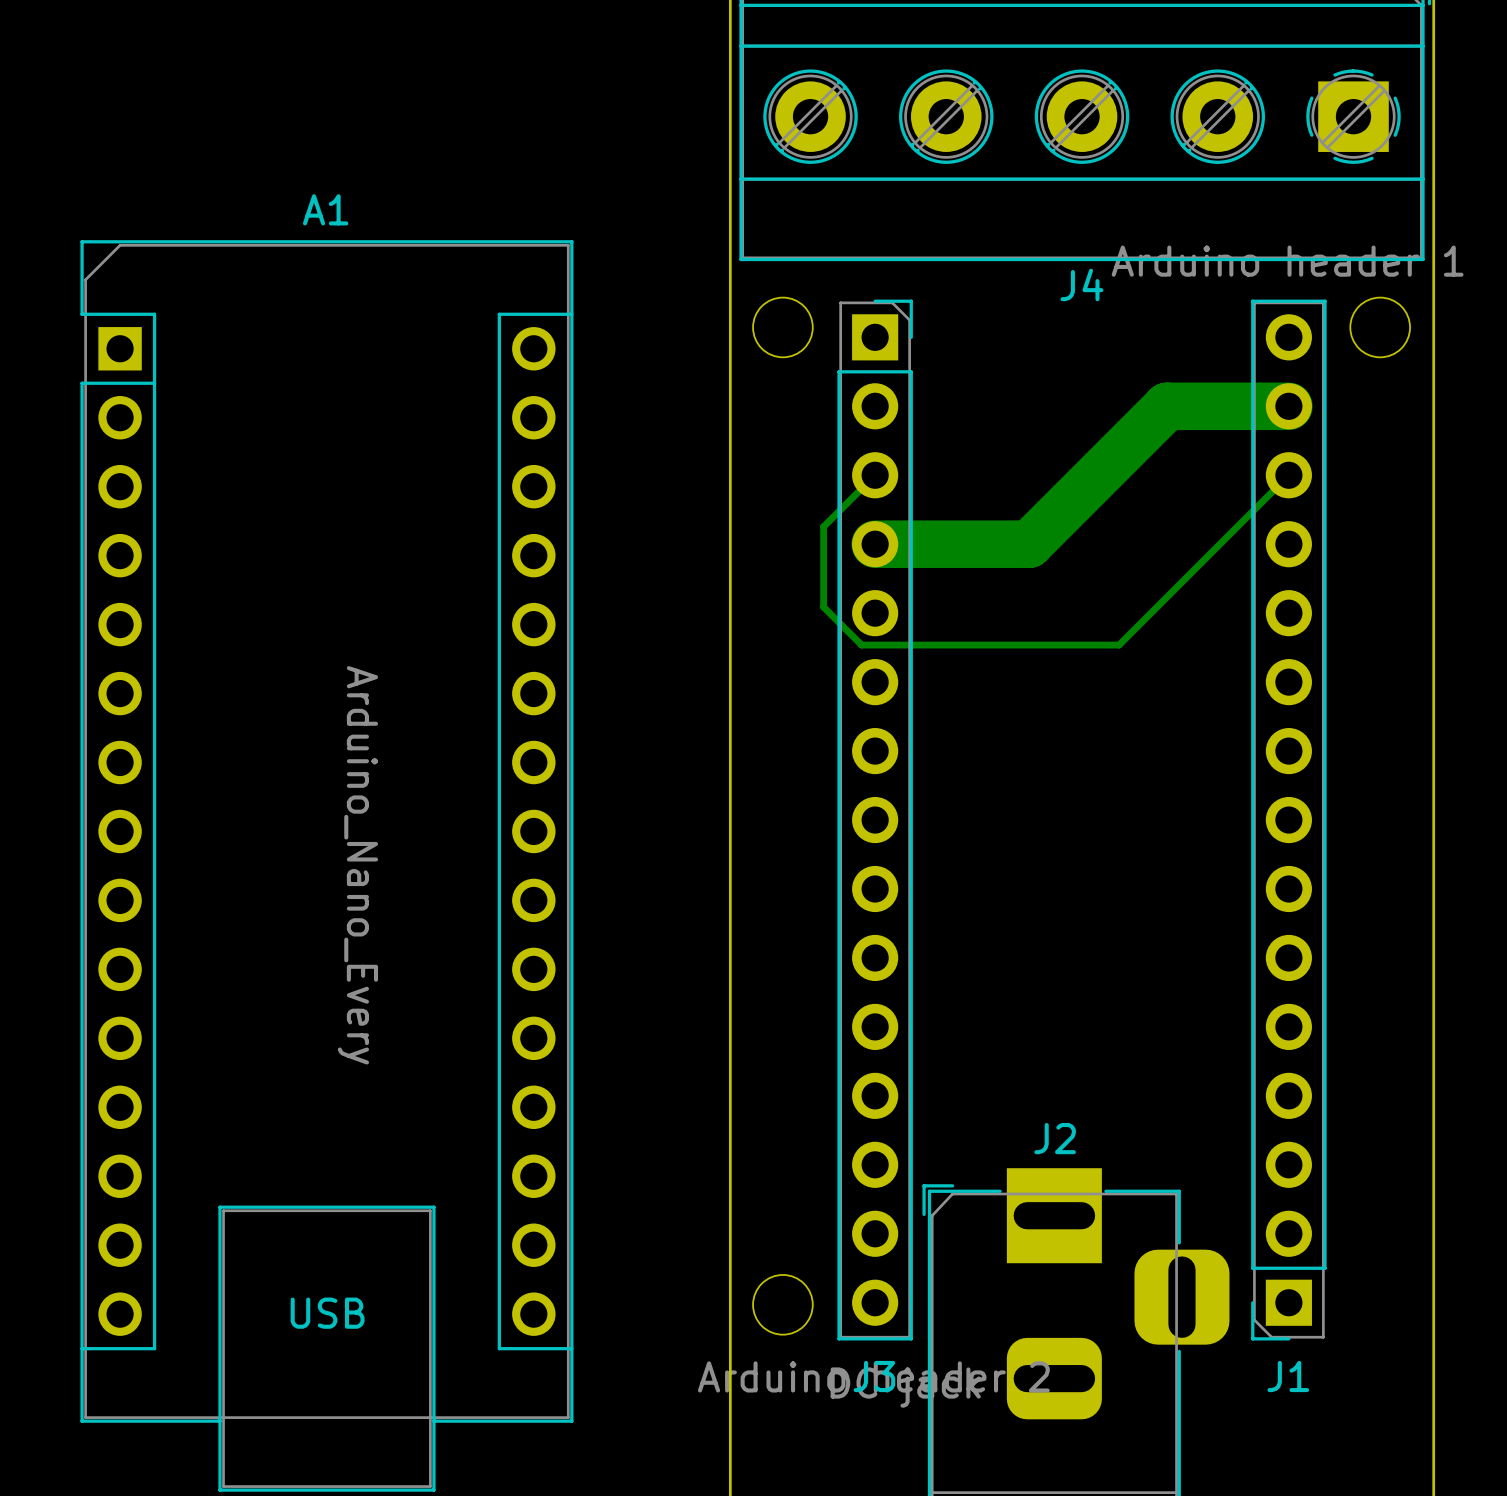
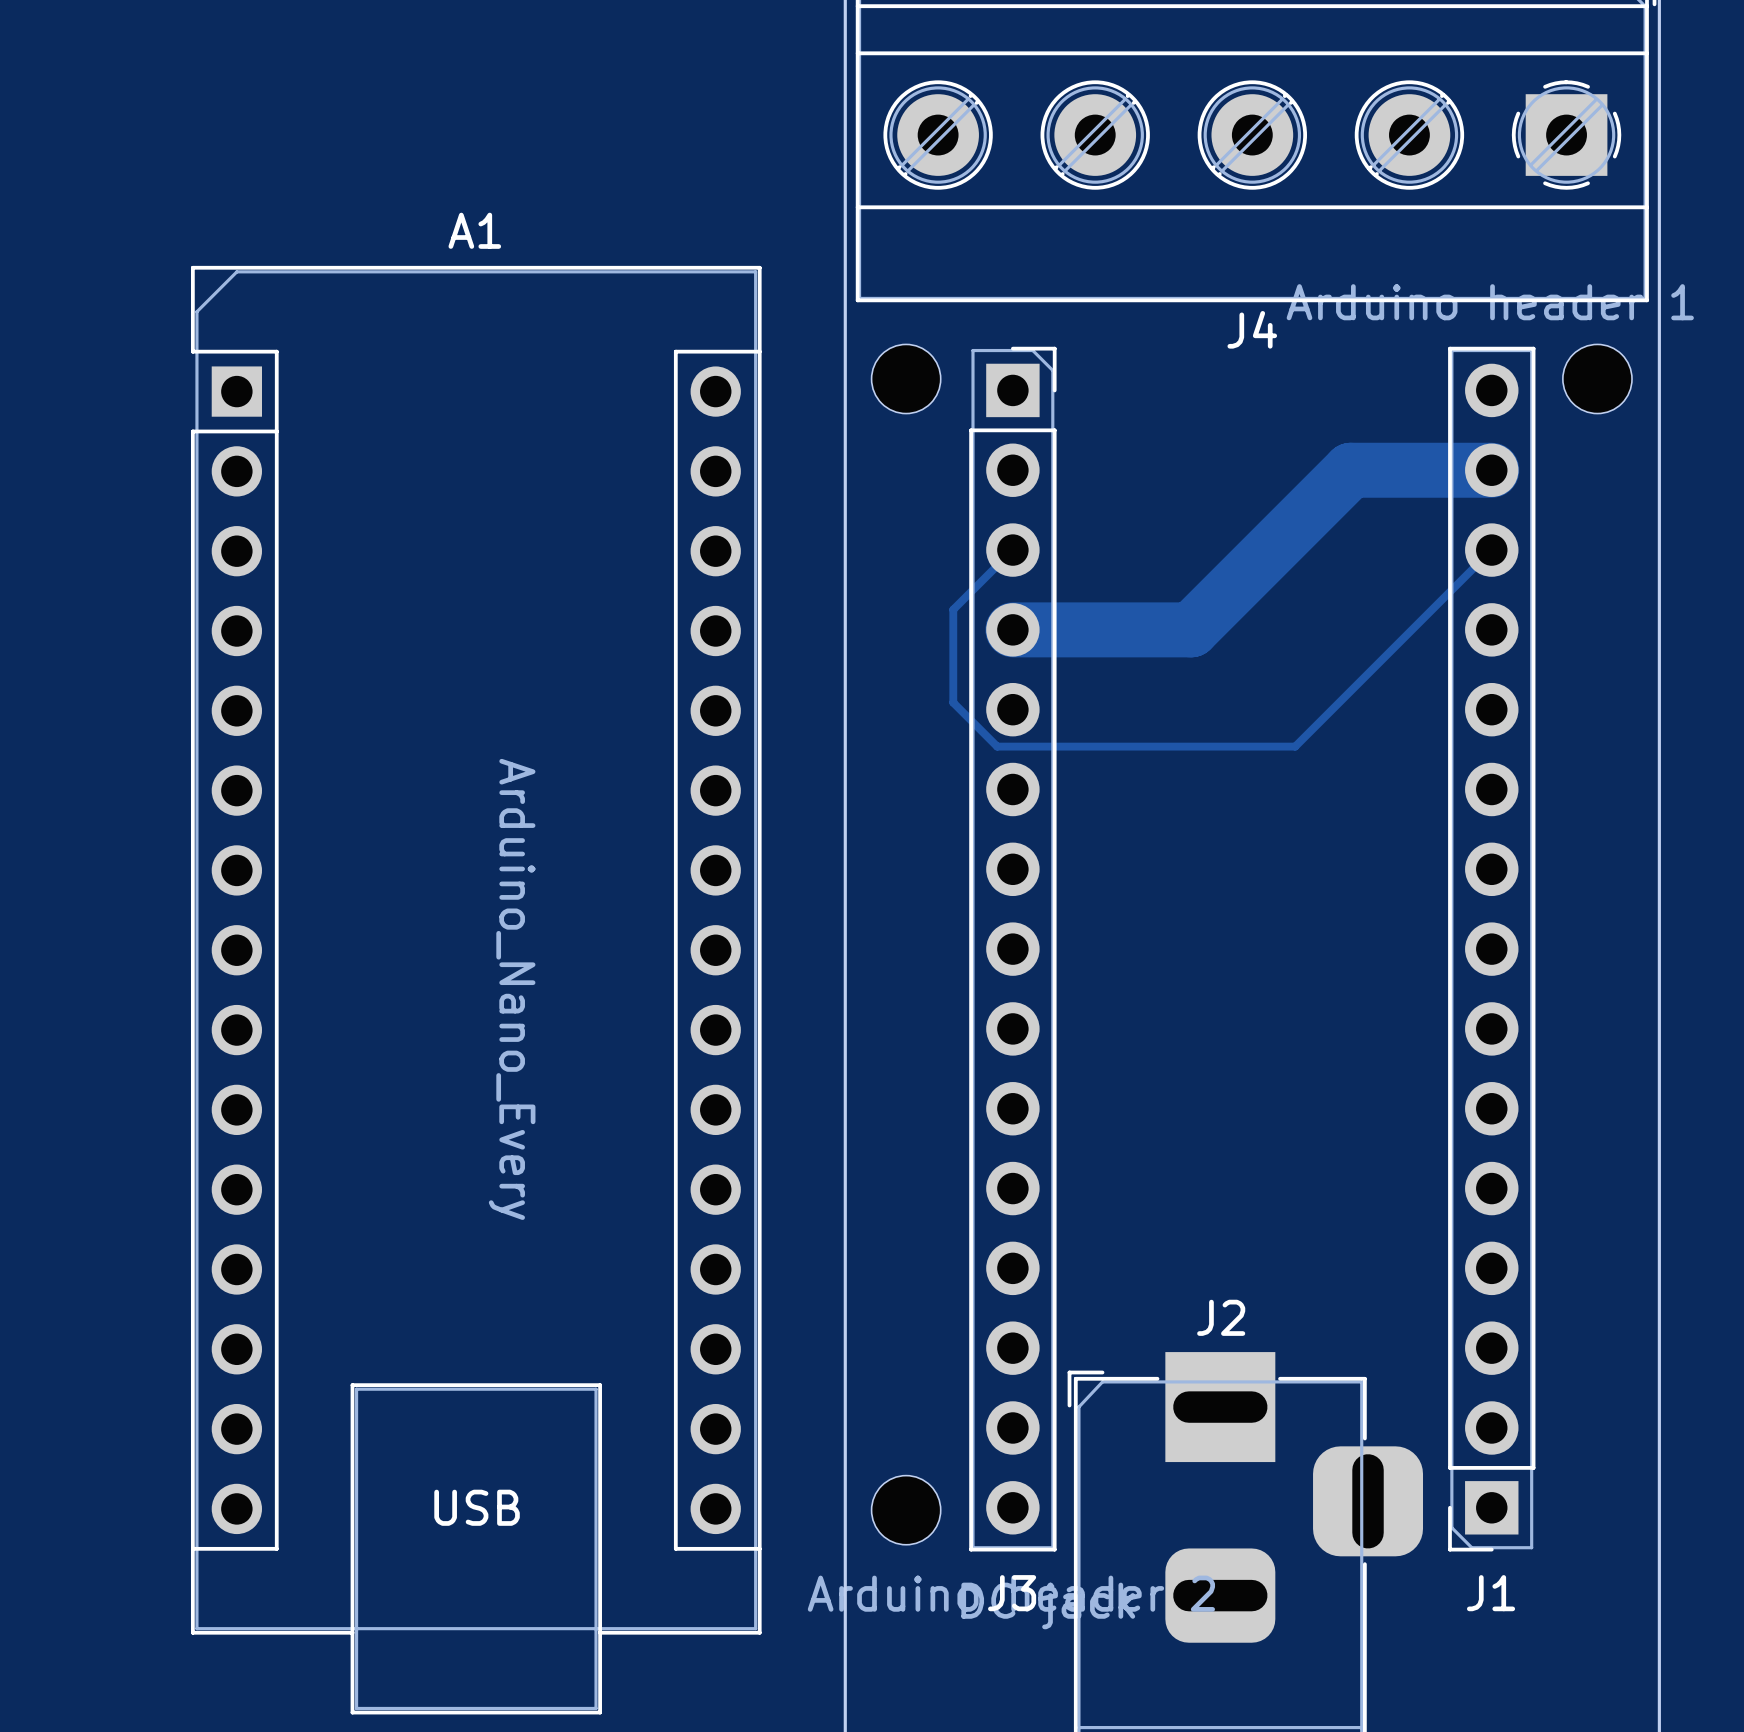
A1 position: (326, 865) -> (476, 990)

